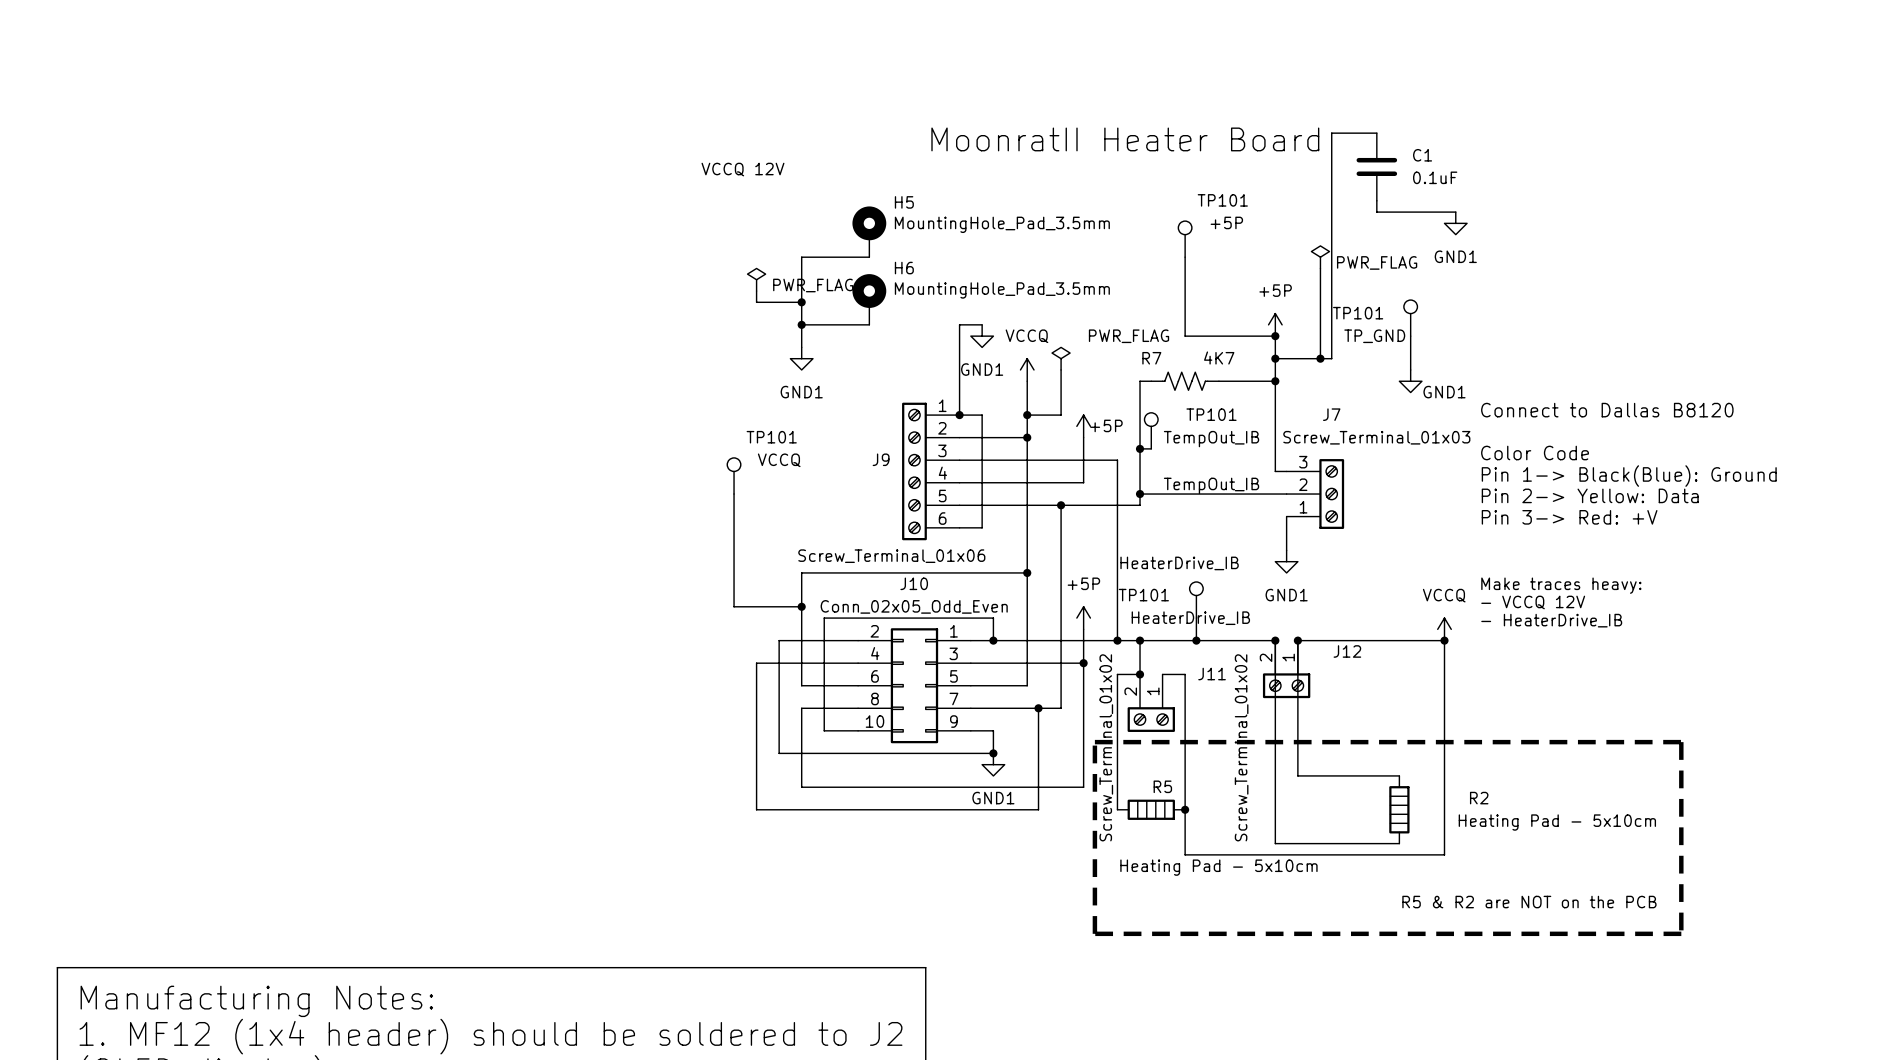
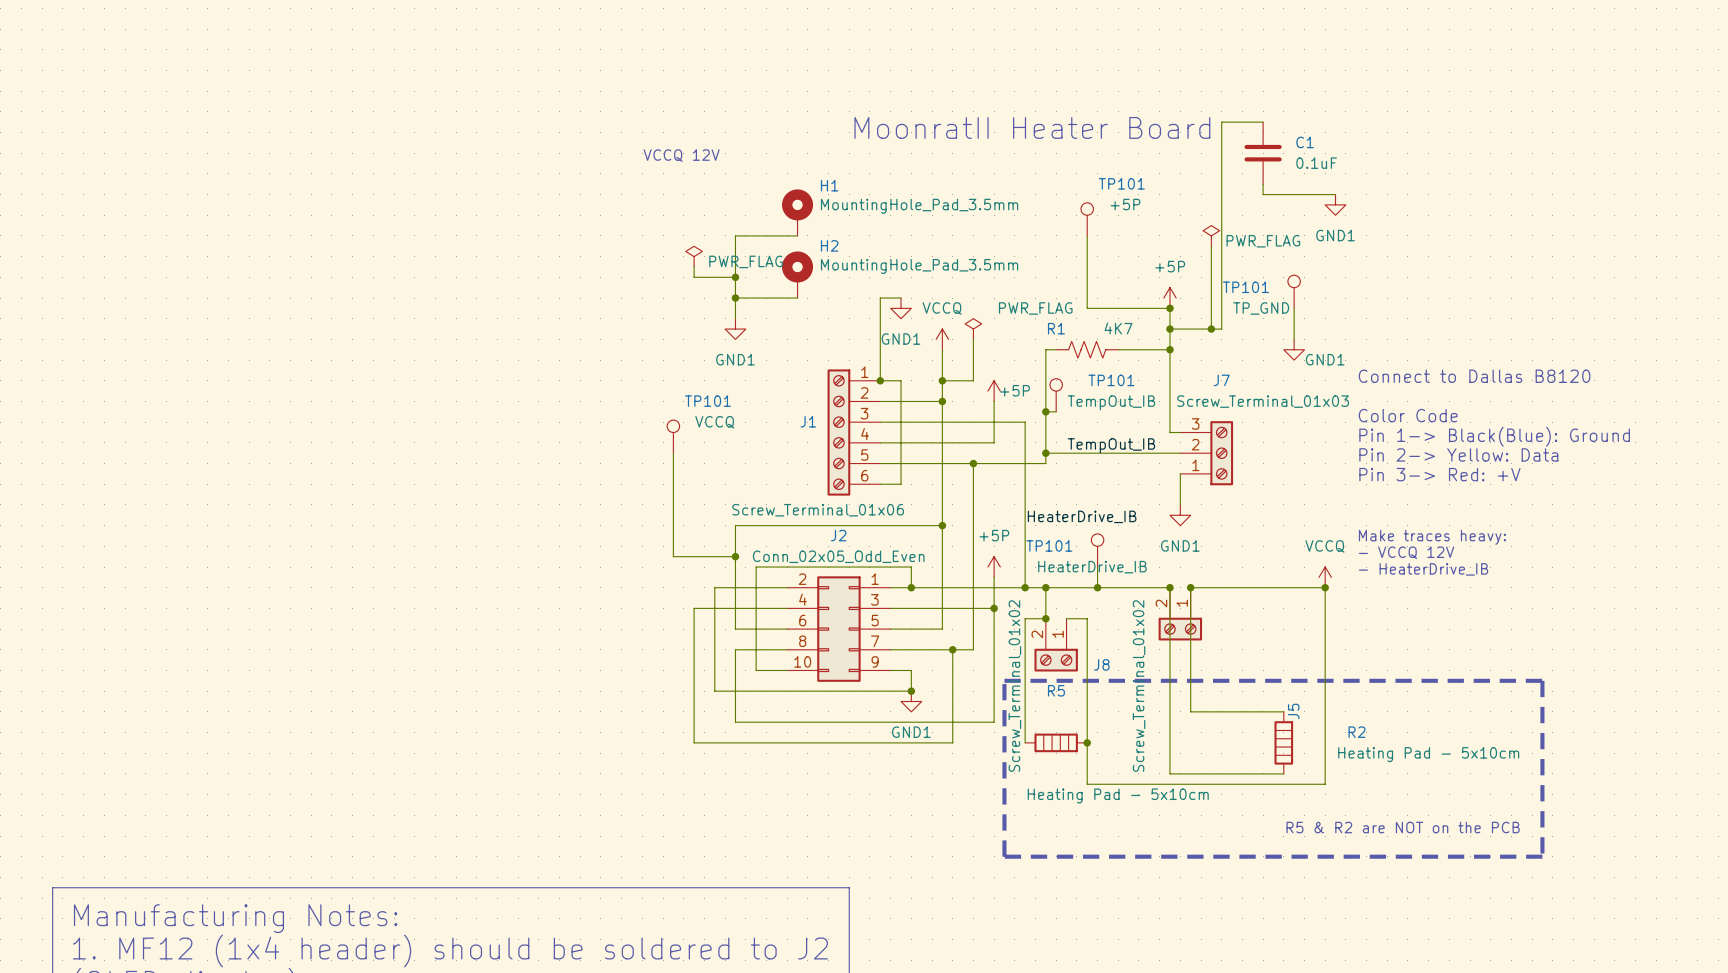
H5 name: H5 (904, 202) -> H1 (829, 185)
H6 name: H6 (904, 268) -> H2 (829, 245)
R7 name: R7 (1151, 358) -> R1 (1056, 328)
J9 name: J9 (881, 459) -> J1 (808, 421)
J10 name: J10 (914, 583) -> J2 (838, 535)
J12 name: J12 (1347, 651) -> J5 (1293, 711)
J11 name: J11 (1212, 674) -> J8 (1101, 664)
R5 name position: R5 (1162, 786) -> R5 (1056, 690)

